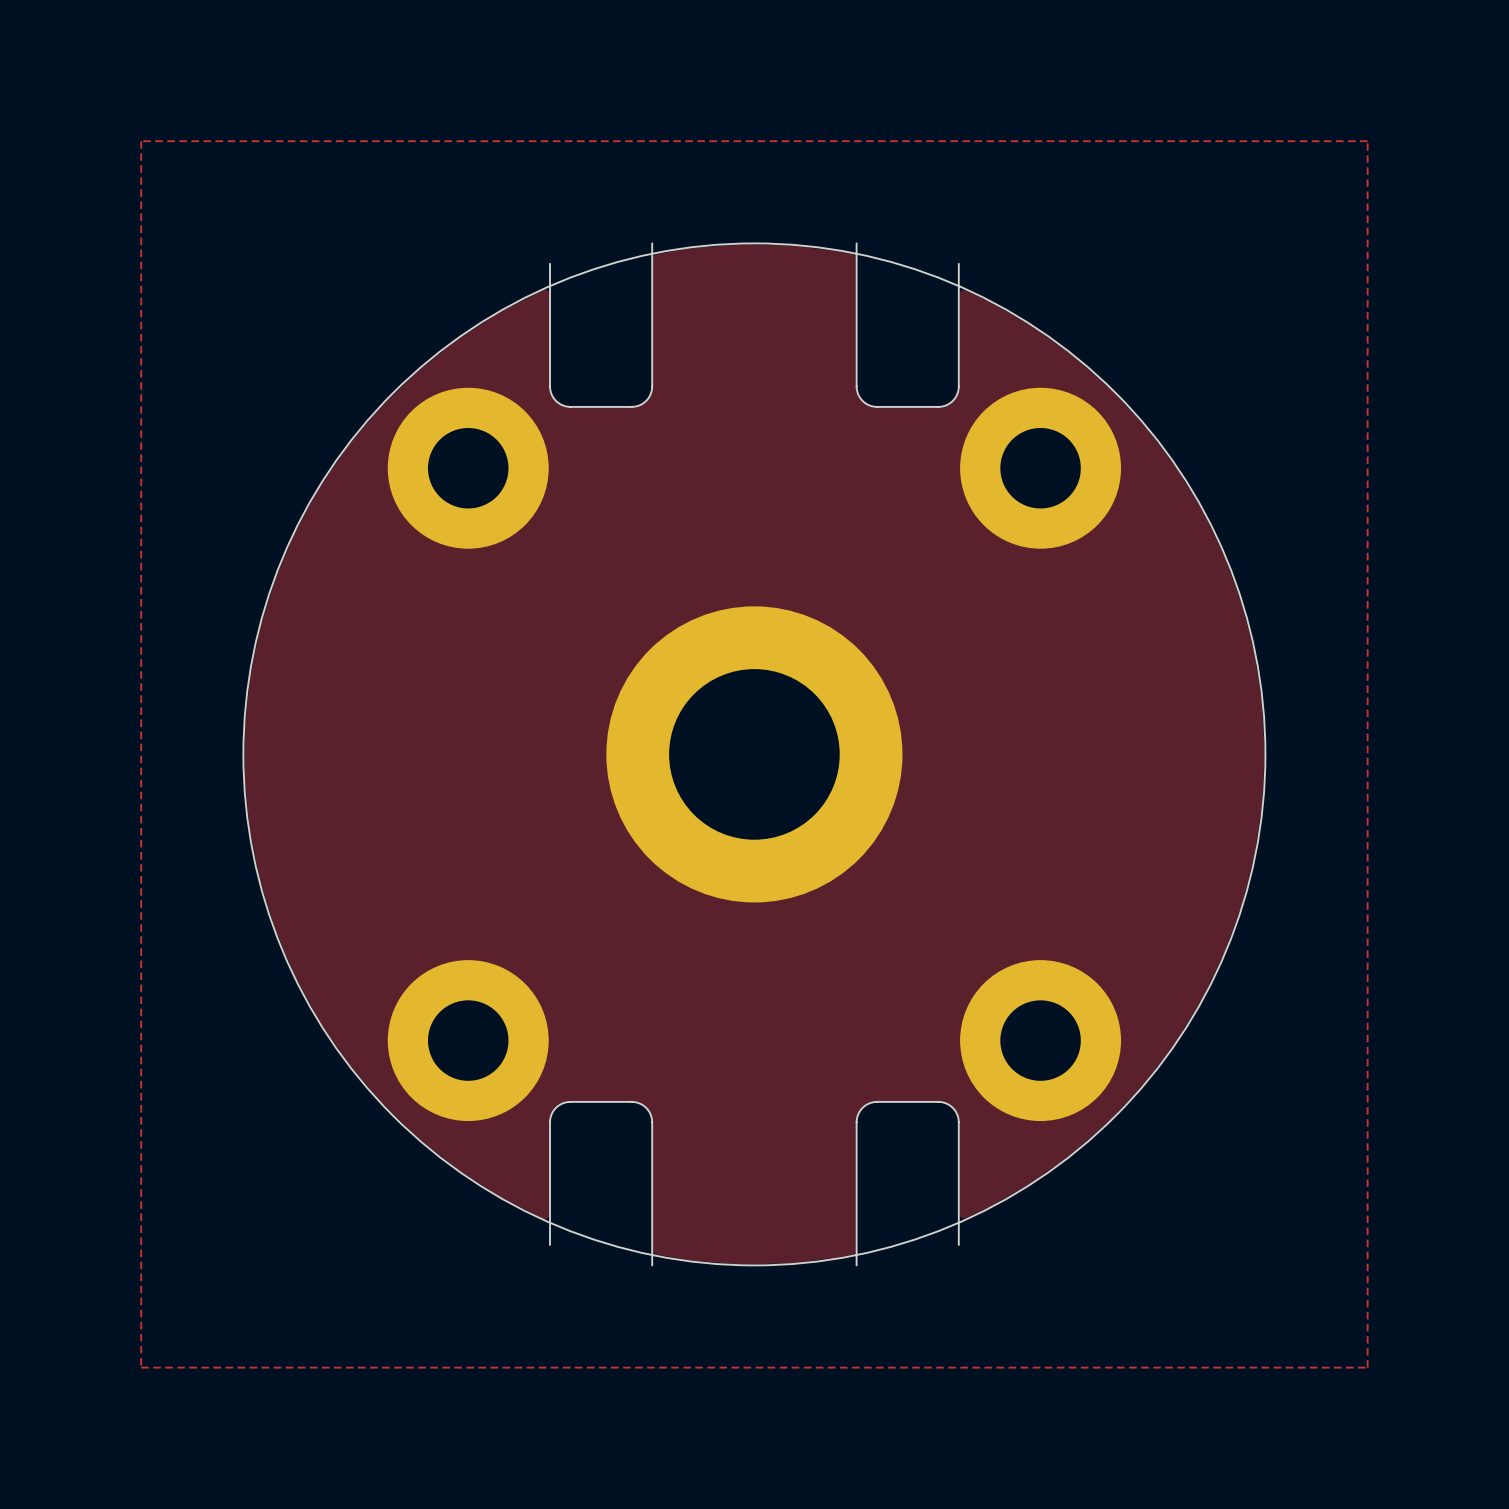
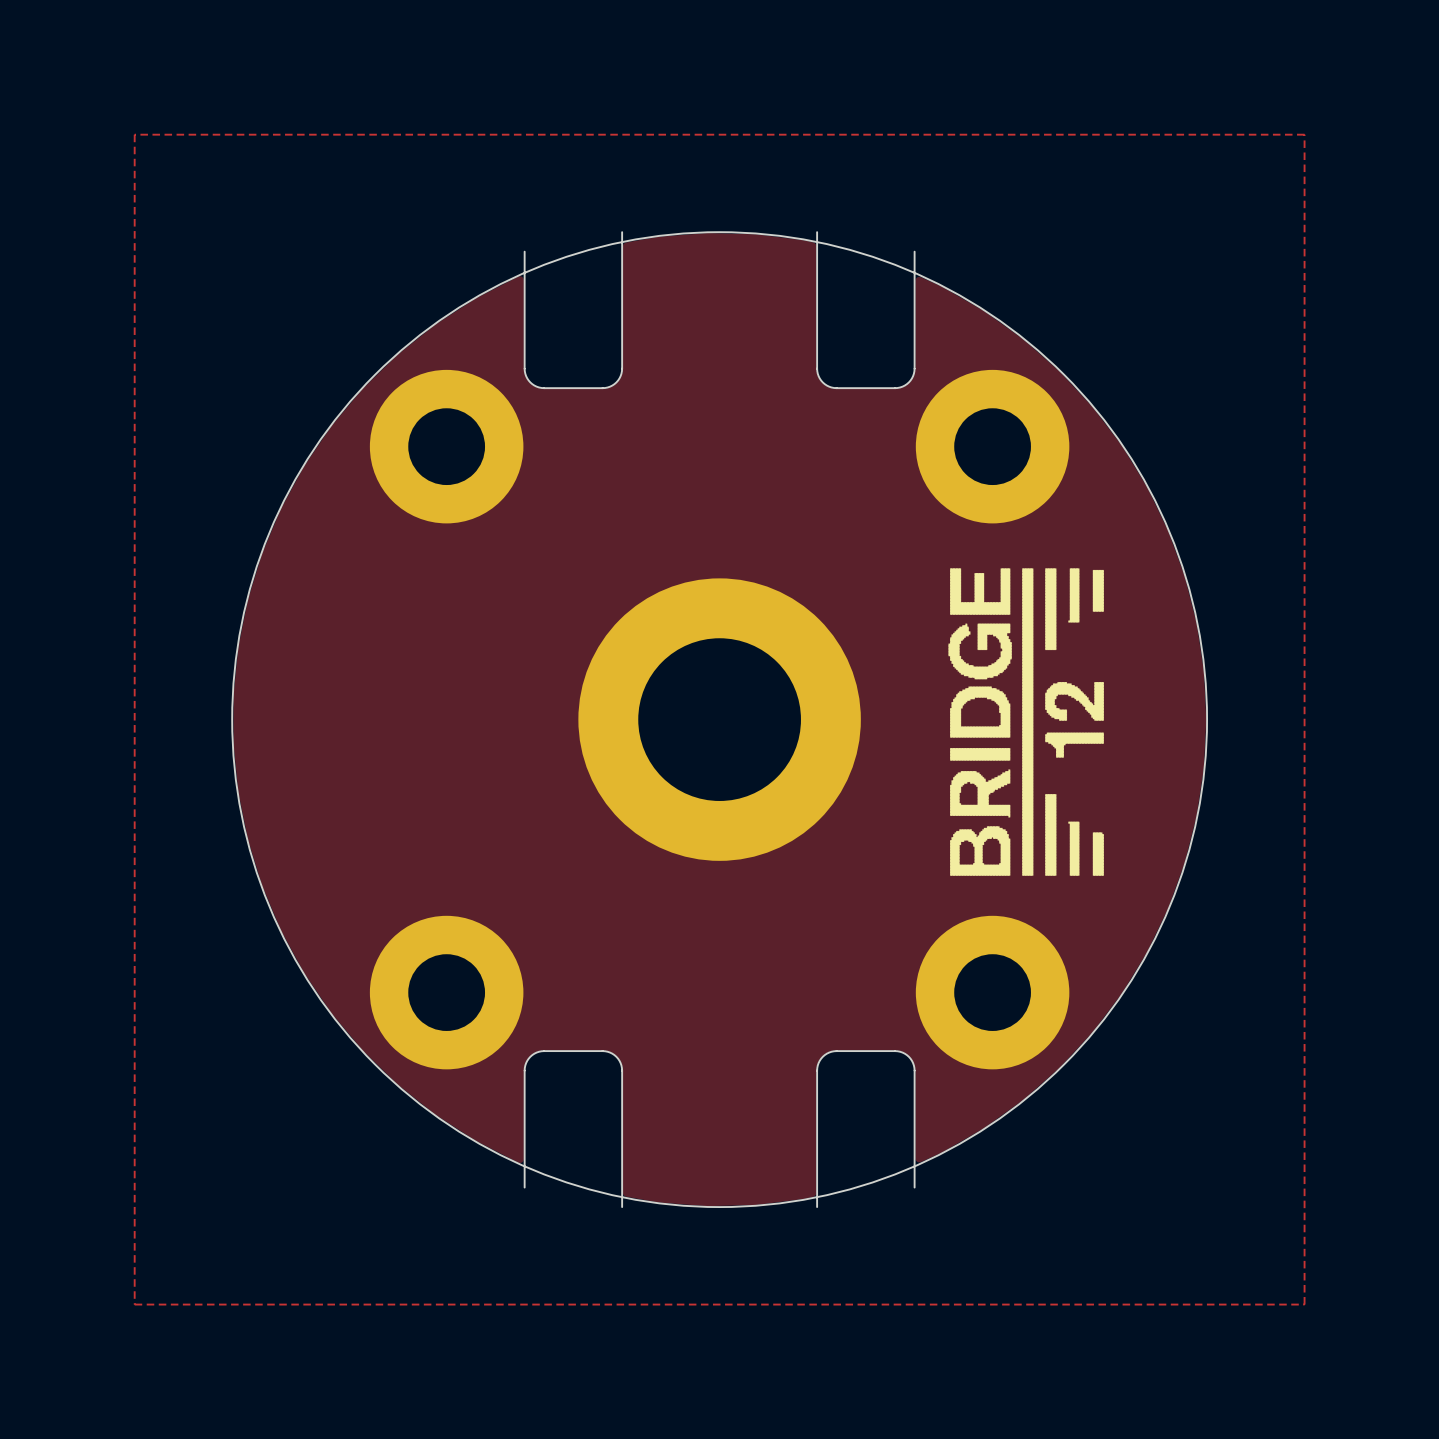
drawing: none -> [948, 568, 1104, 876]

